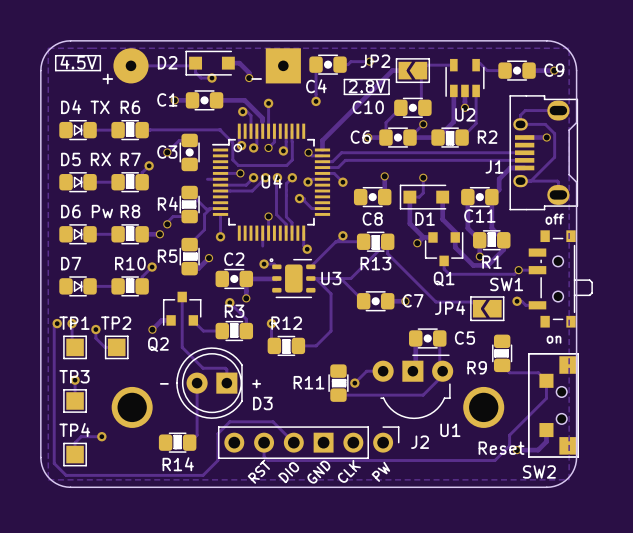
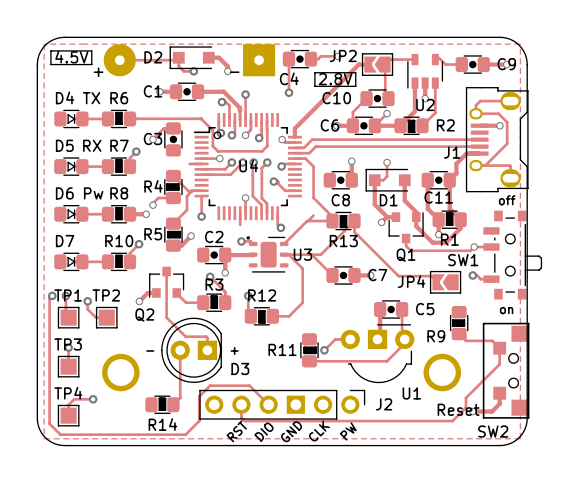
track: none -> (313, 166) (313, 197) (332, 216) (332, 221)
via: (342, 182) -> none
via: (342, 235) -> none

